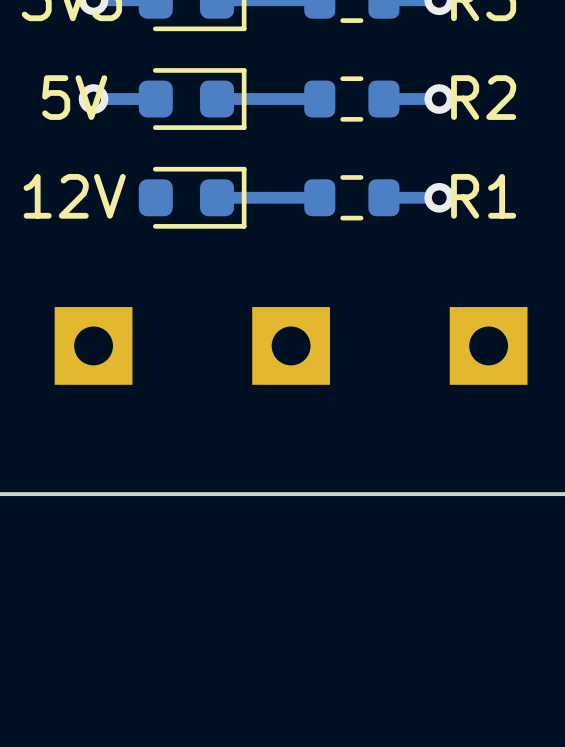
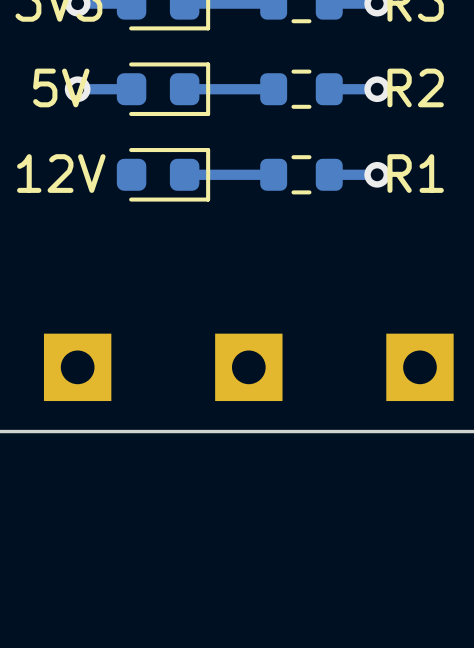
part position: (93, 345) -> (77, 367)
part position: (291, 345) -> (248, 367)
part position: (488, 345) -> (419, 367)

